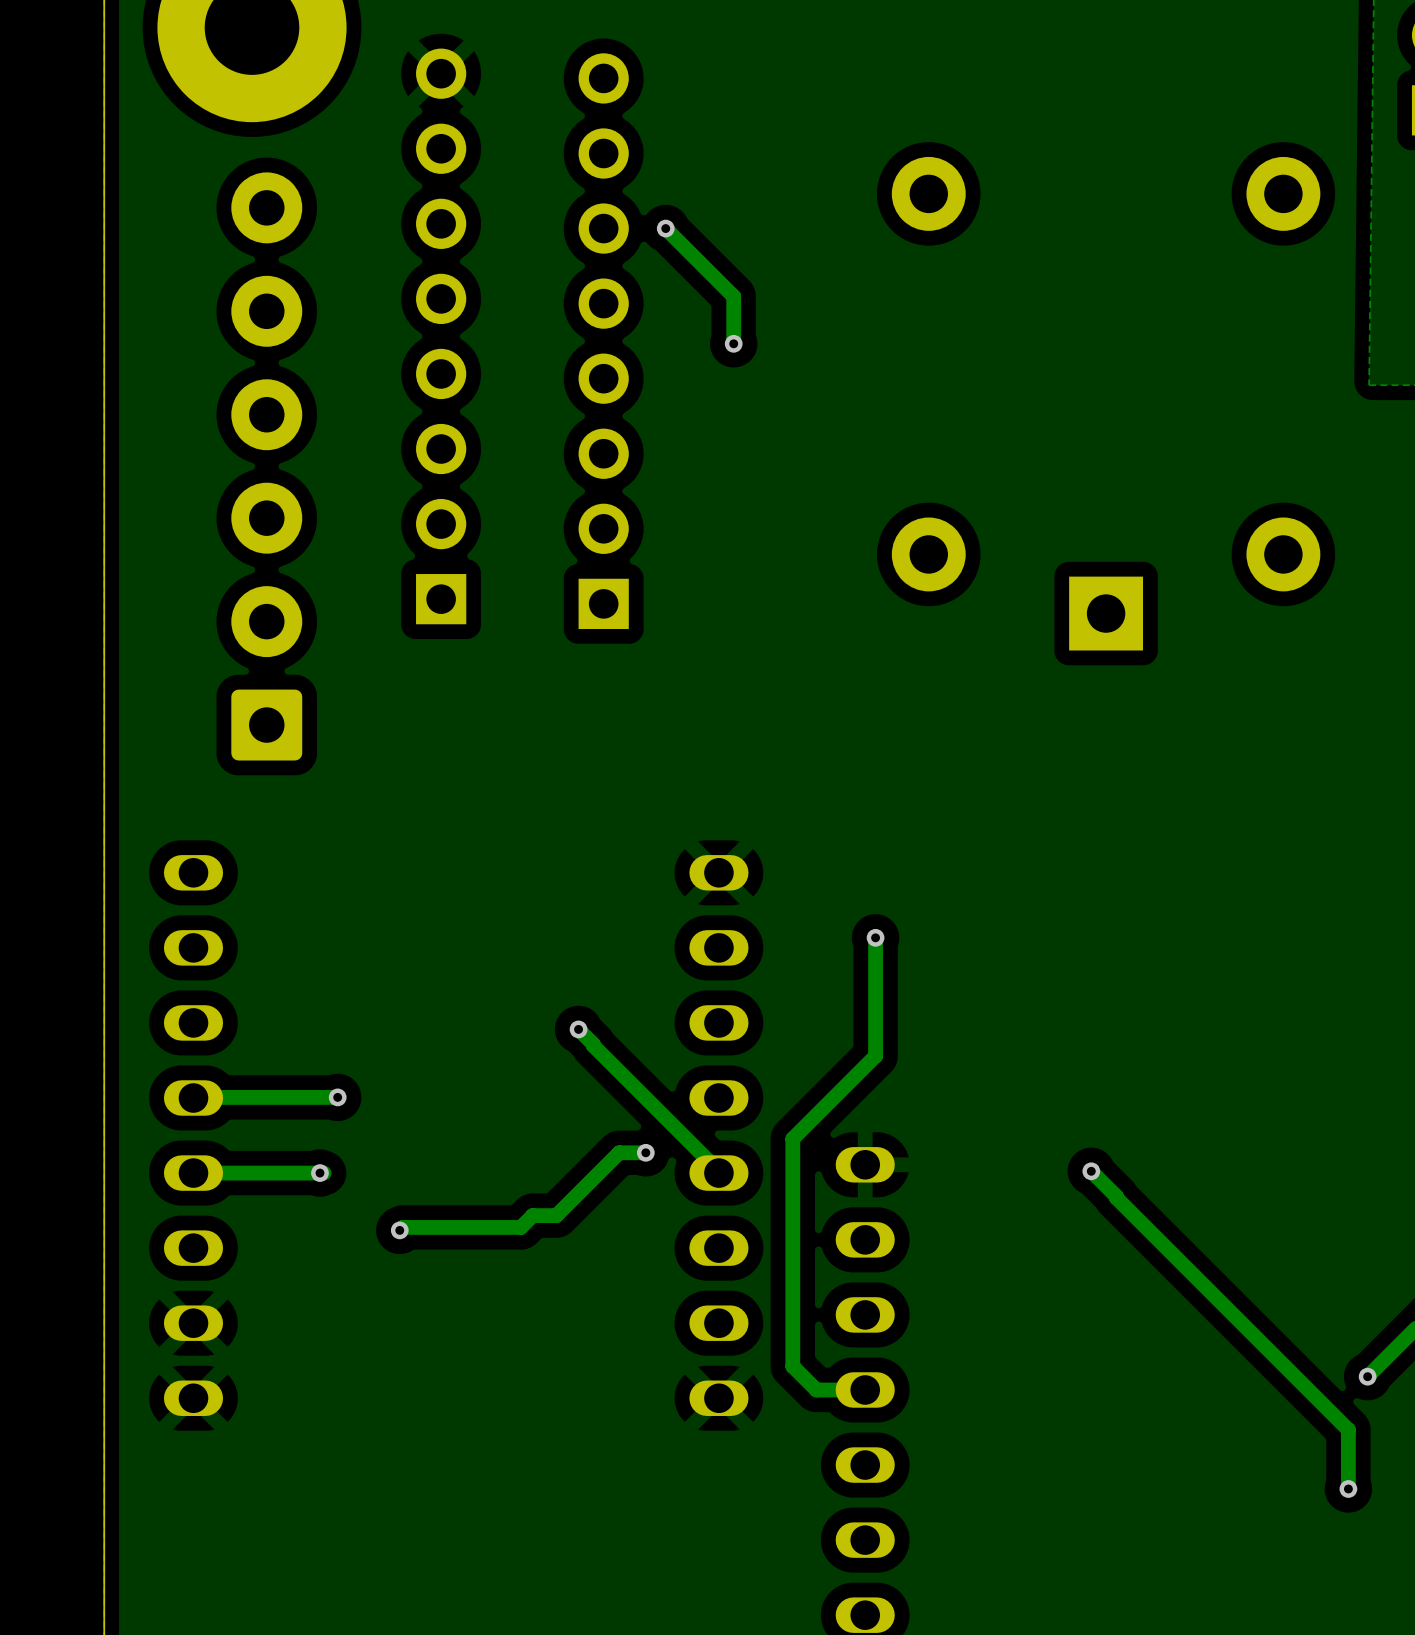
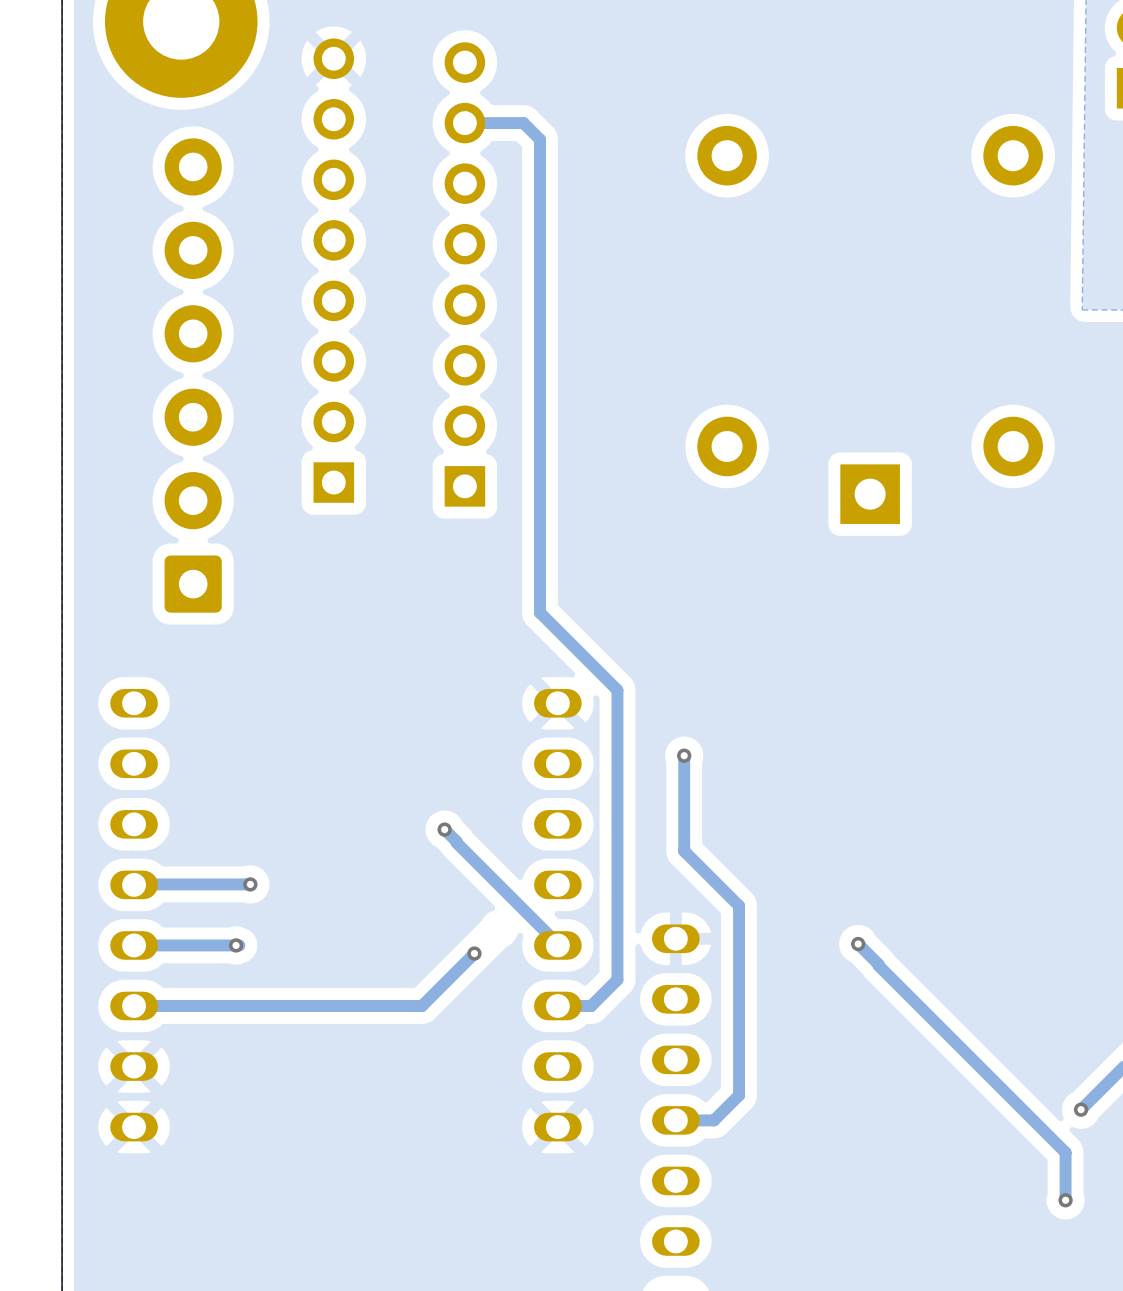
track: (665, 228) (733, 296) (733, 343) -> none
via: (665, 228) -> none
via: (733, 343) -> none
track: (875, 1056) (792, 1138) -> (464, 123) (523, 123) (539, 139) (539, 612) (617, 690) (617, 917)
track: (645, 1152) (619, 1152) (556, 1215) (532, 1215) (520, 1227) (402, 1227) (399, 1230) -> none
via position: (645, 1152) -> (474, 953)
track: none -> (474, 953) (422, 1005) (134, 1005)
track: (792, 1215) (792, 1366) (816, 1389) (865, 1389) -> (684, 851) (739, 905) (739, 1095) (713, 1120) (675, 1120)
track: none -> (617, 979) (591, 1005) (557, 1005)
via: (399, 1230) -> none

